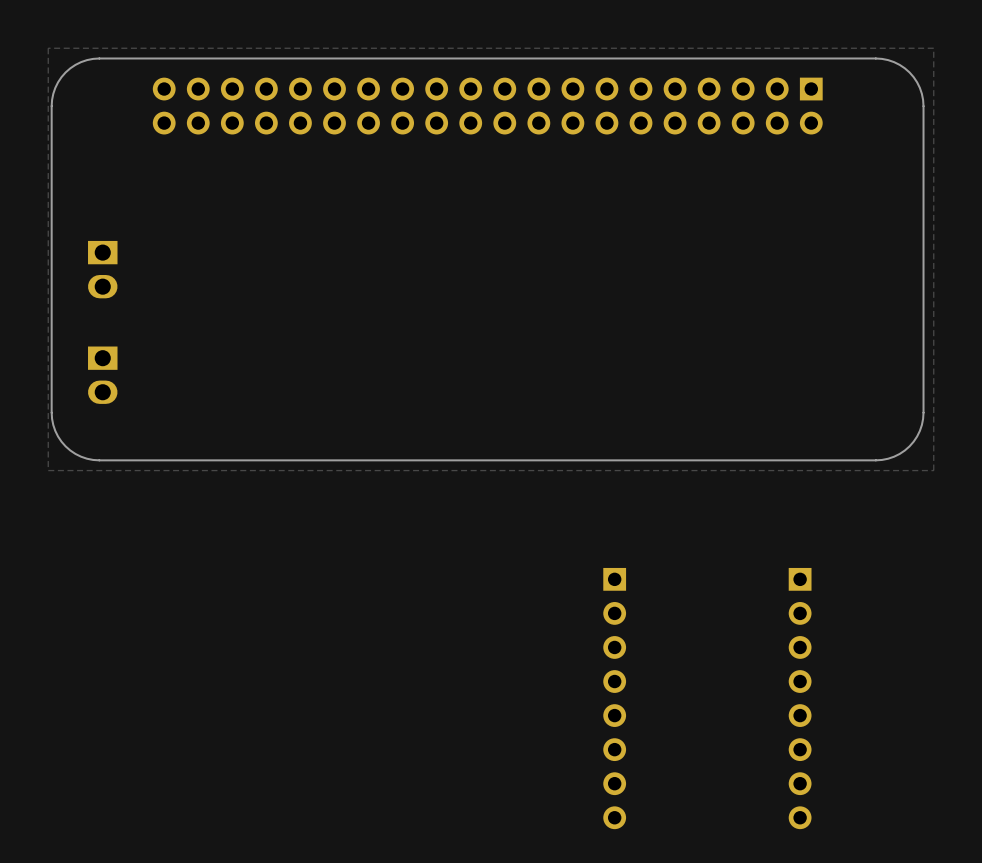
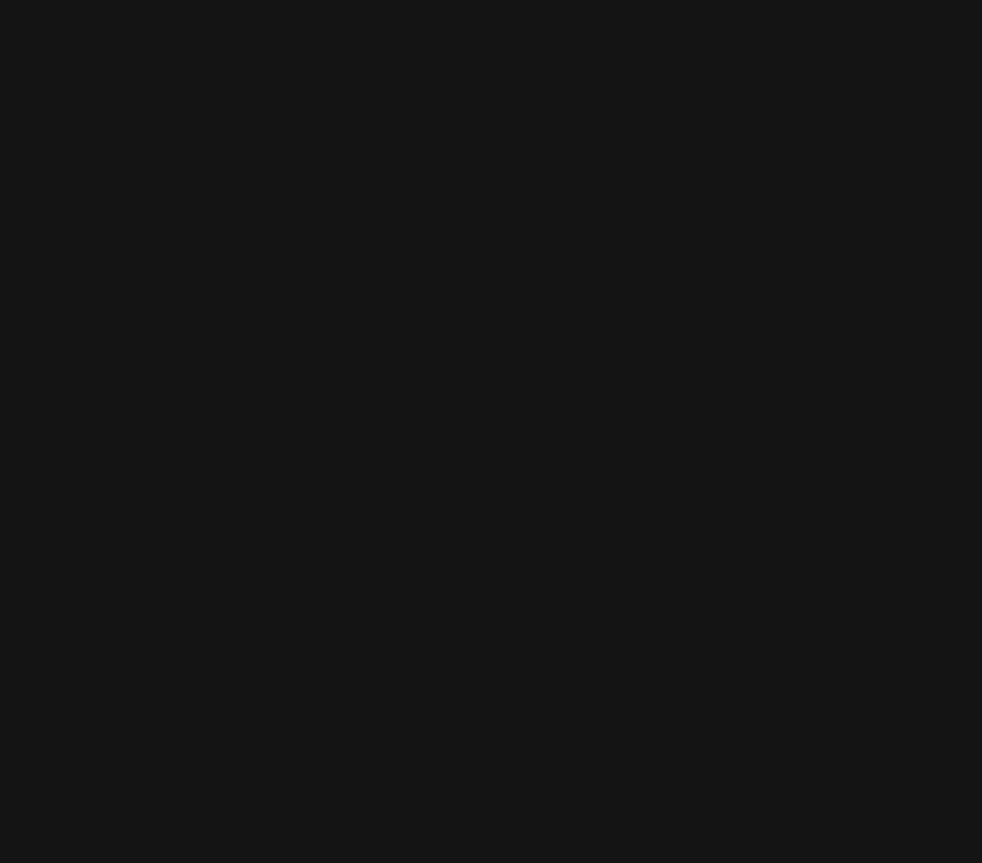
zone outline: (933, 48) (48, 48) (48, 470) (933, 470) (933, 48) -> none
board edge: (875, 58) (99, 58) (81, 62) (70, 68) (61, 77) (55, 87) (52, 99) (51, 412) (55, 430) (61, 441) (70, 450) (81, 456) (99, 460) (875, 460) (894, 456) (904, 450) (913, 441) (919, 430) (923, 418) (923, 106) (919, 87) (909, 72) (894, 62) (875, 58) -> none
part: (487, 106) -> none
part: (102, 269) -> none
part: (102, 375) -> none
part: (614, 698) -> none
part: (800, 698) -> none

